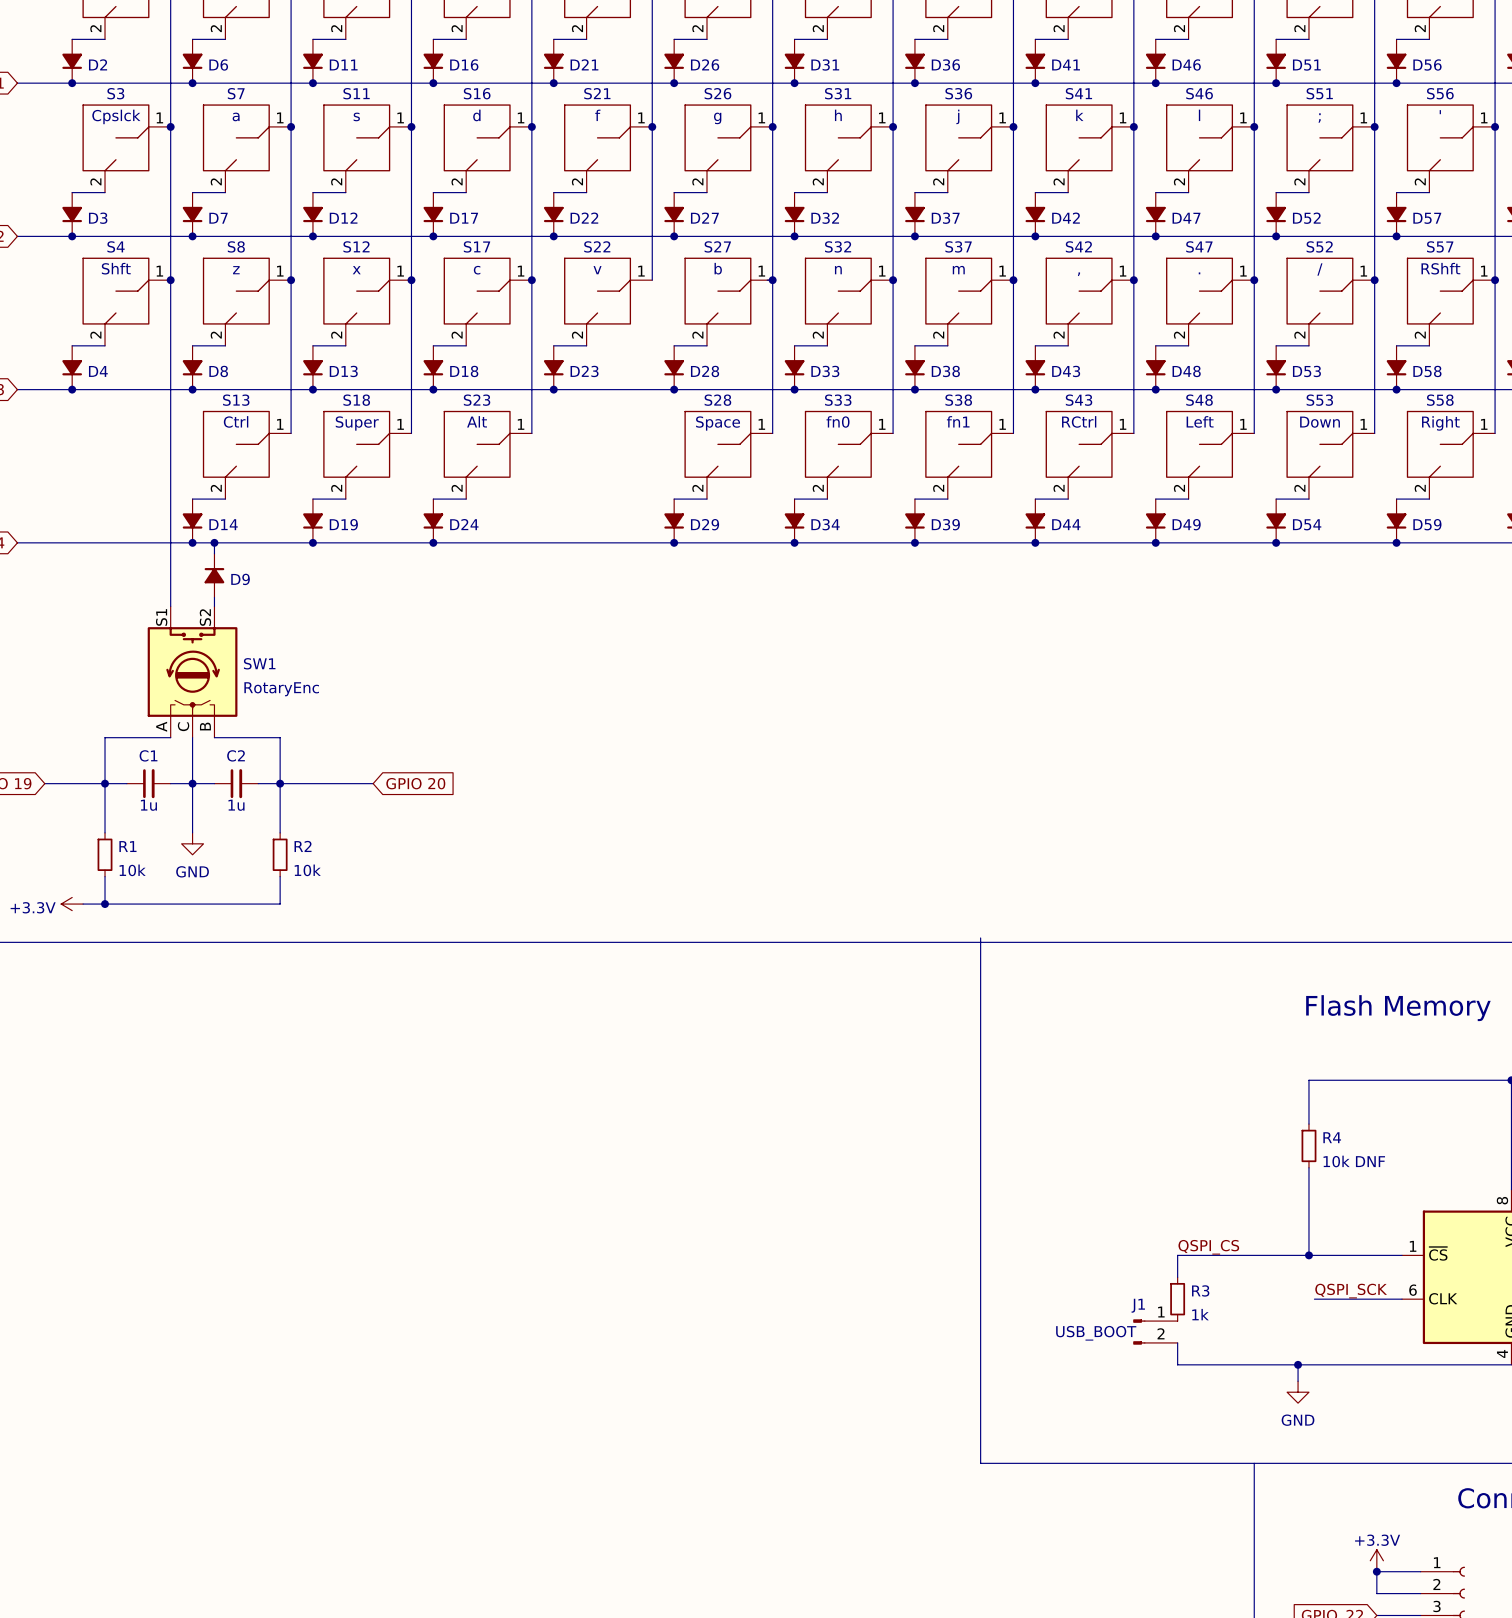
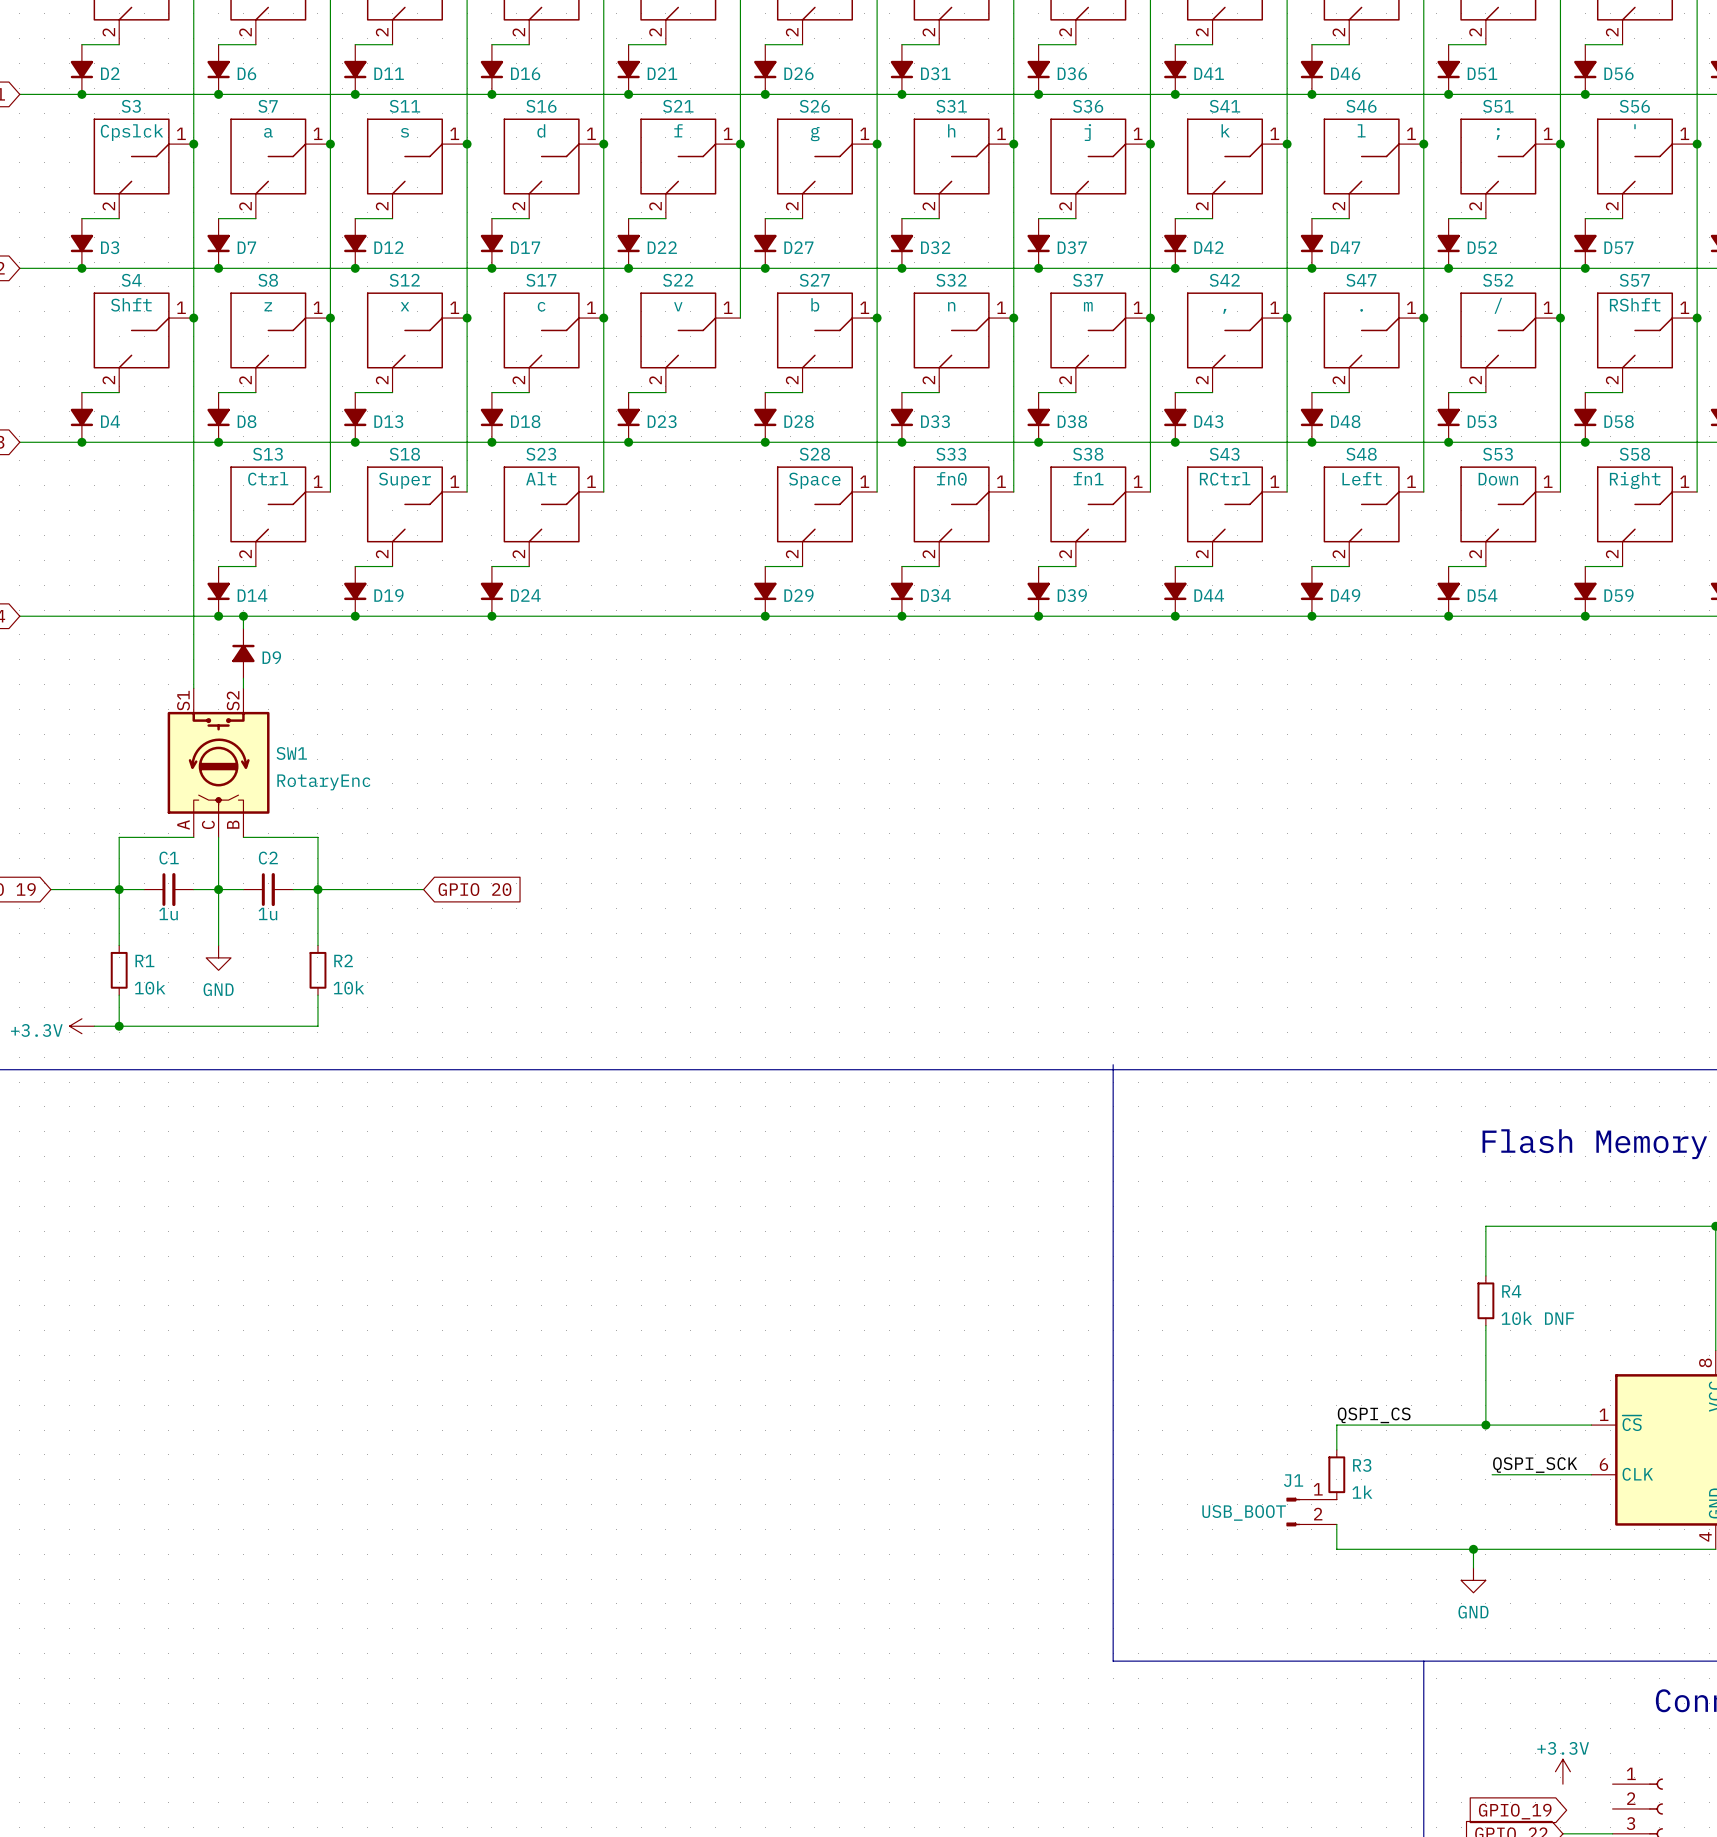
junction: (1376, 1571) -> none
wire: (1420, 1571) (1376, 1571) (1376, 1593) (1420, 1593) -> none
global label: none -> GPIO_19 (1515, 1811)

